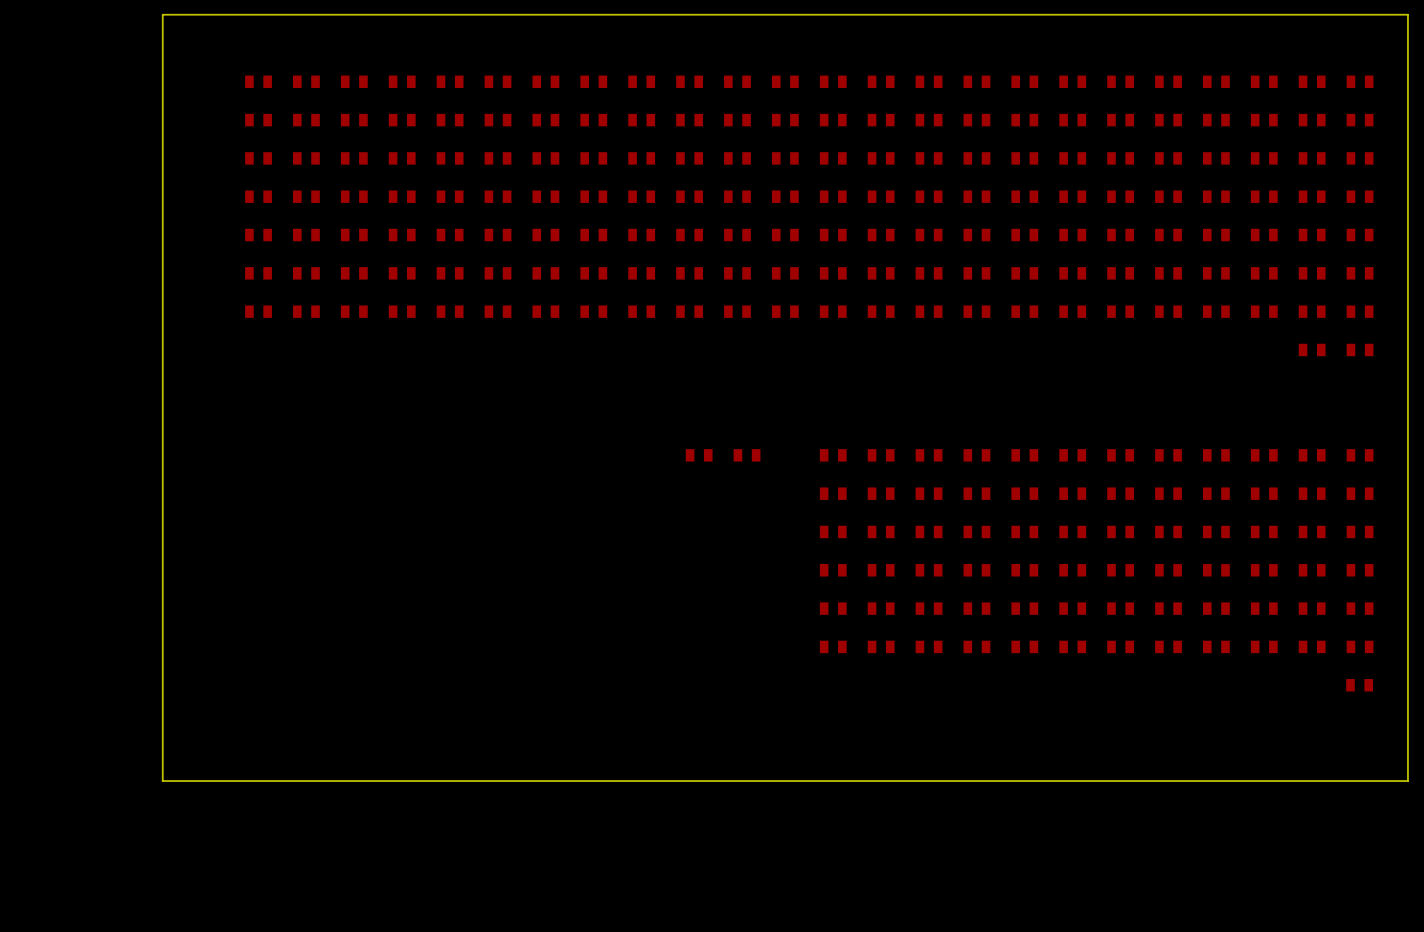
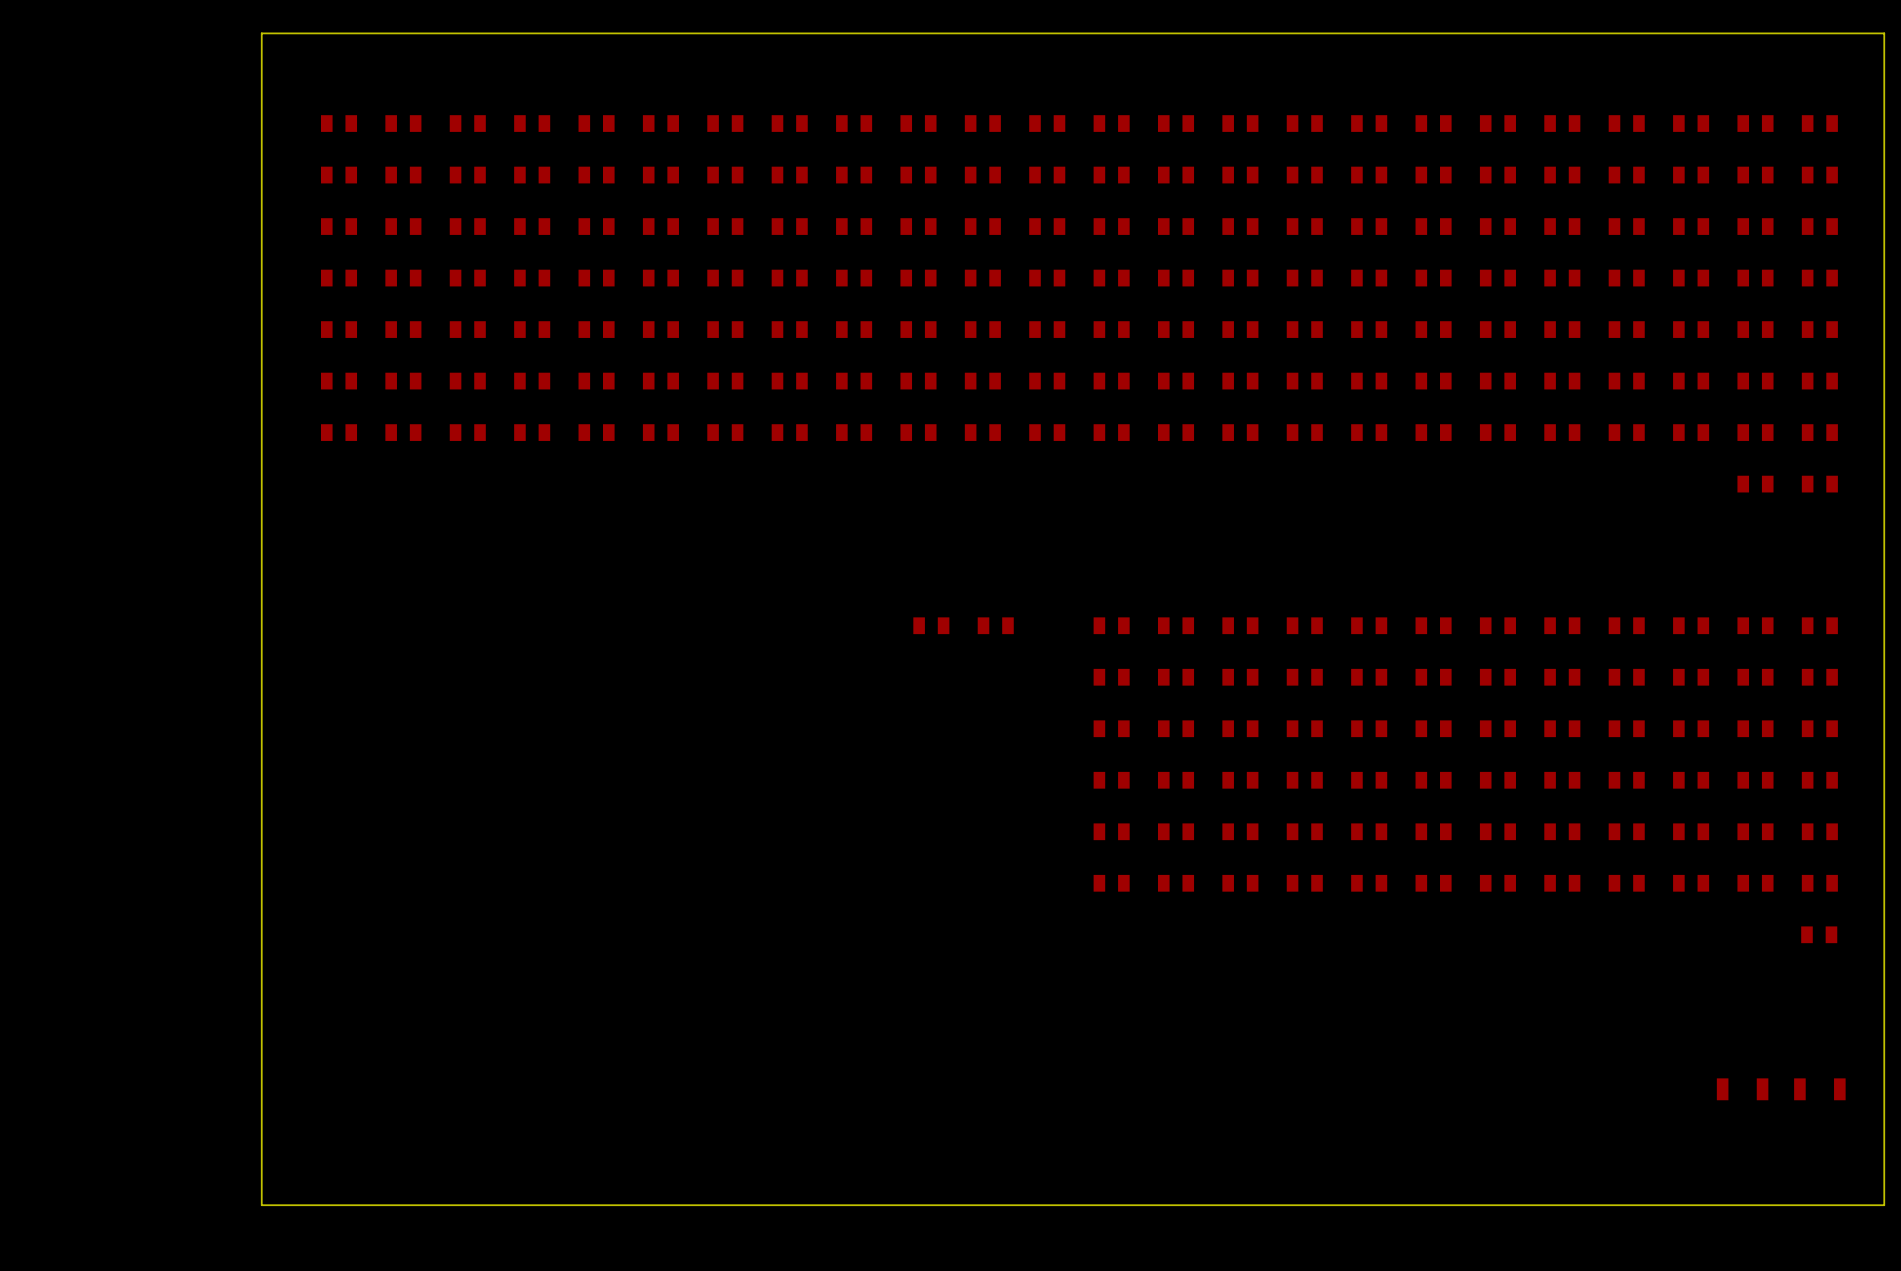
board edge: (201, 14) (162, 14) (162, 781) (1407, 781) -> (261, 33) (261, 1205) (1884, 1205) (1884, 1063)
part: none -> (1742, 1089)
part: none -> (1819, 1089)

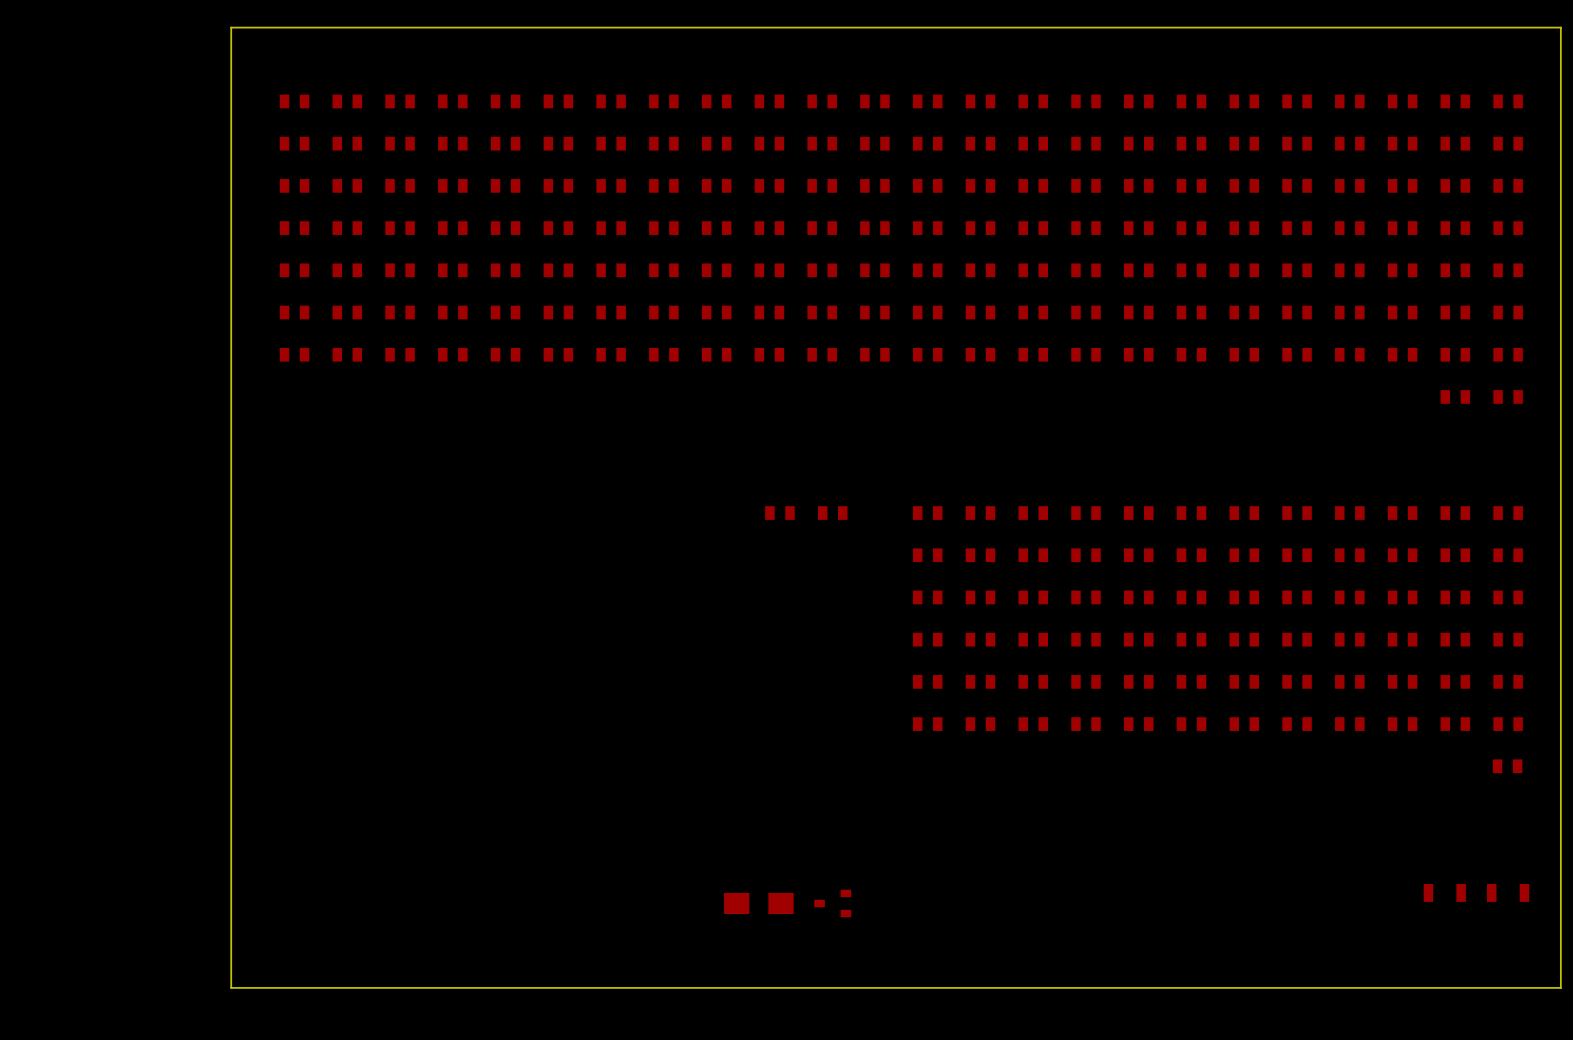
part: none -> (758, 903)
part: none -> (832, 903)

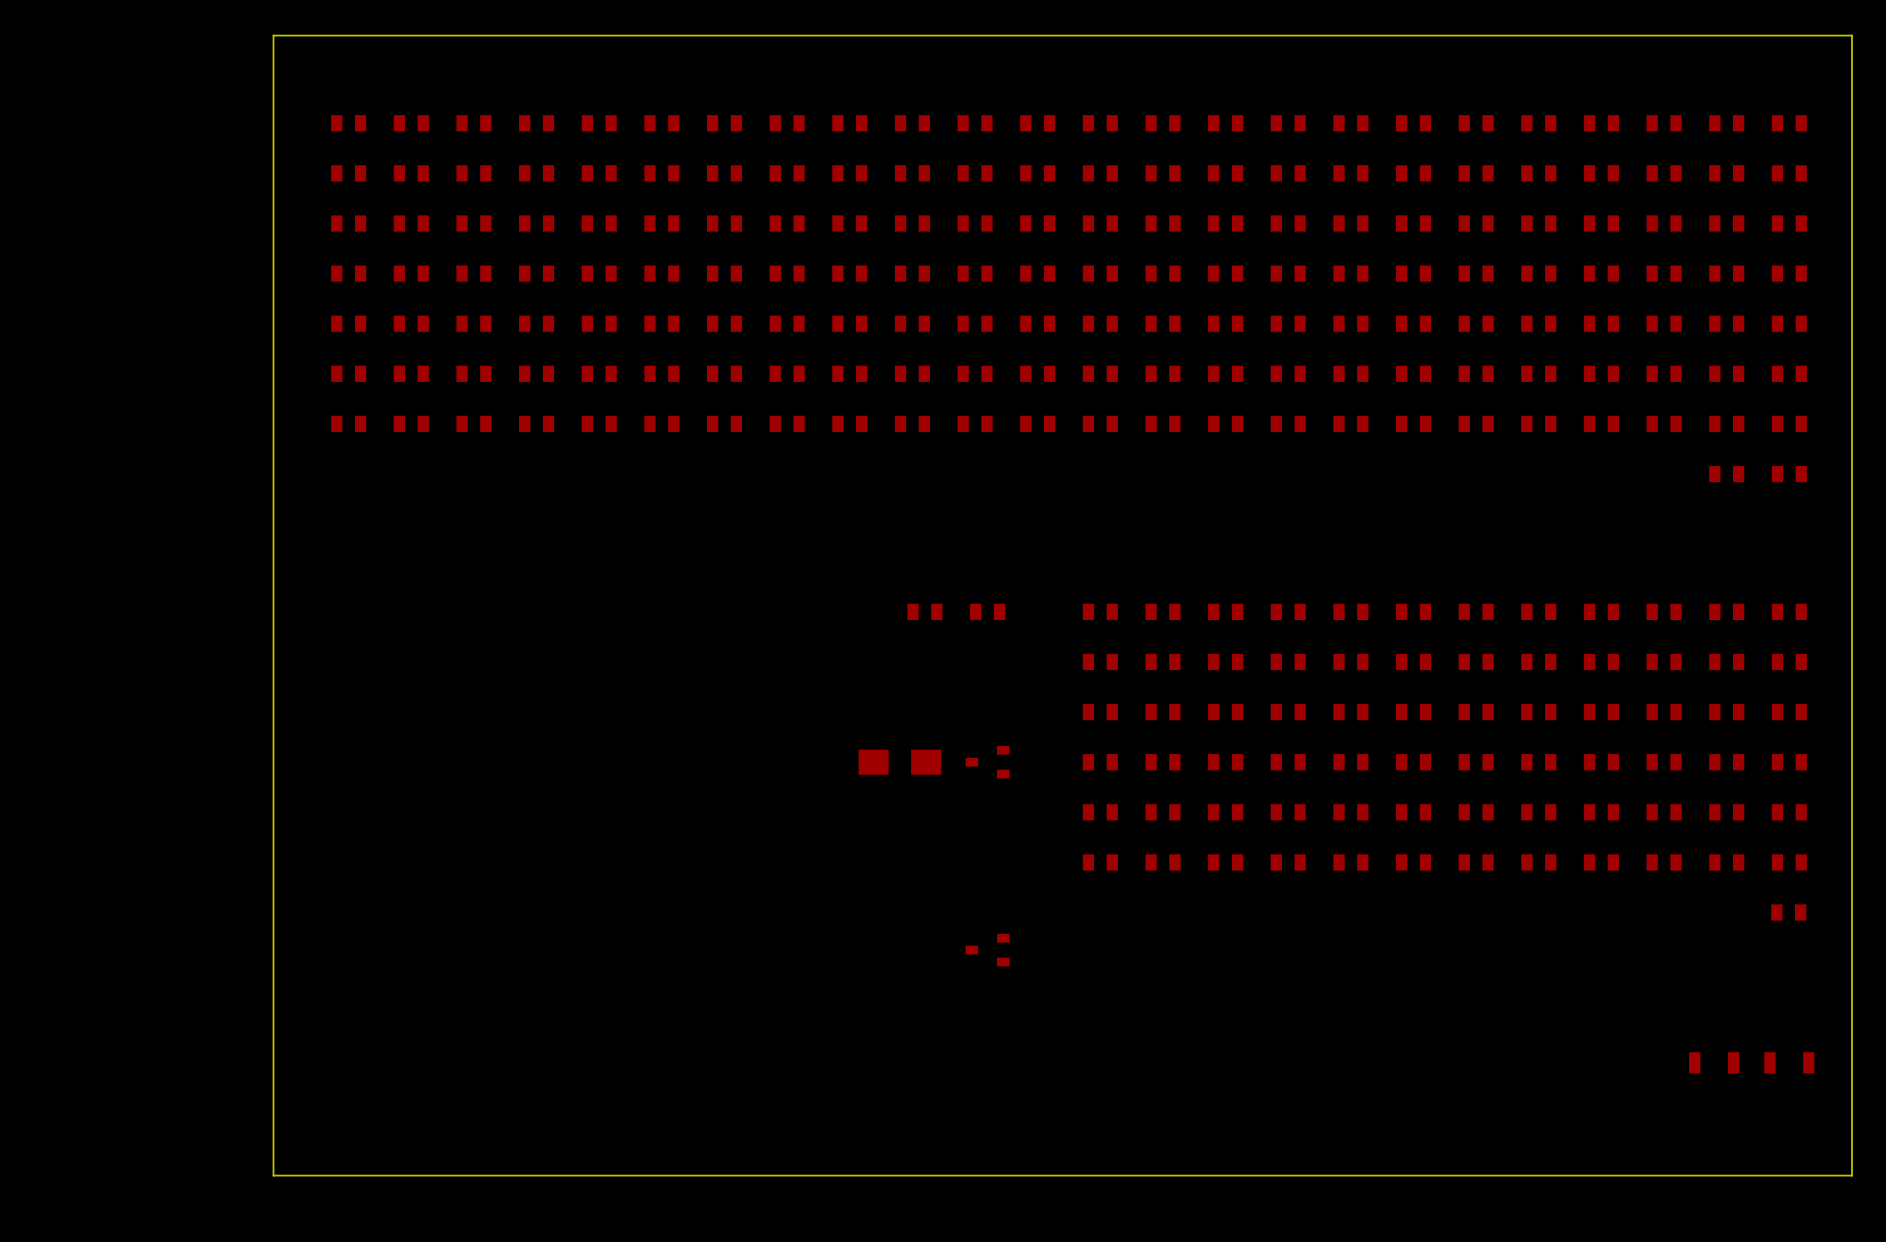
part: none -> (987, 762)
part position: (758, 903) -> (899, 762)
part position: (832, 903) -> (987, 950)

